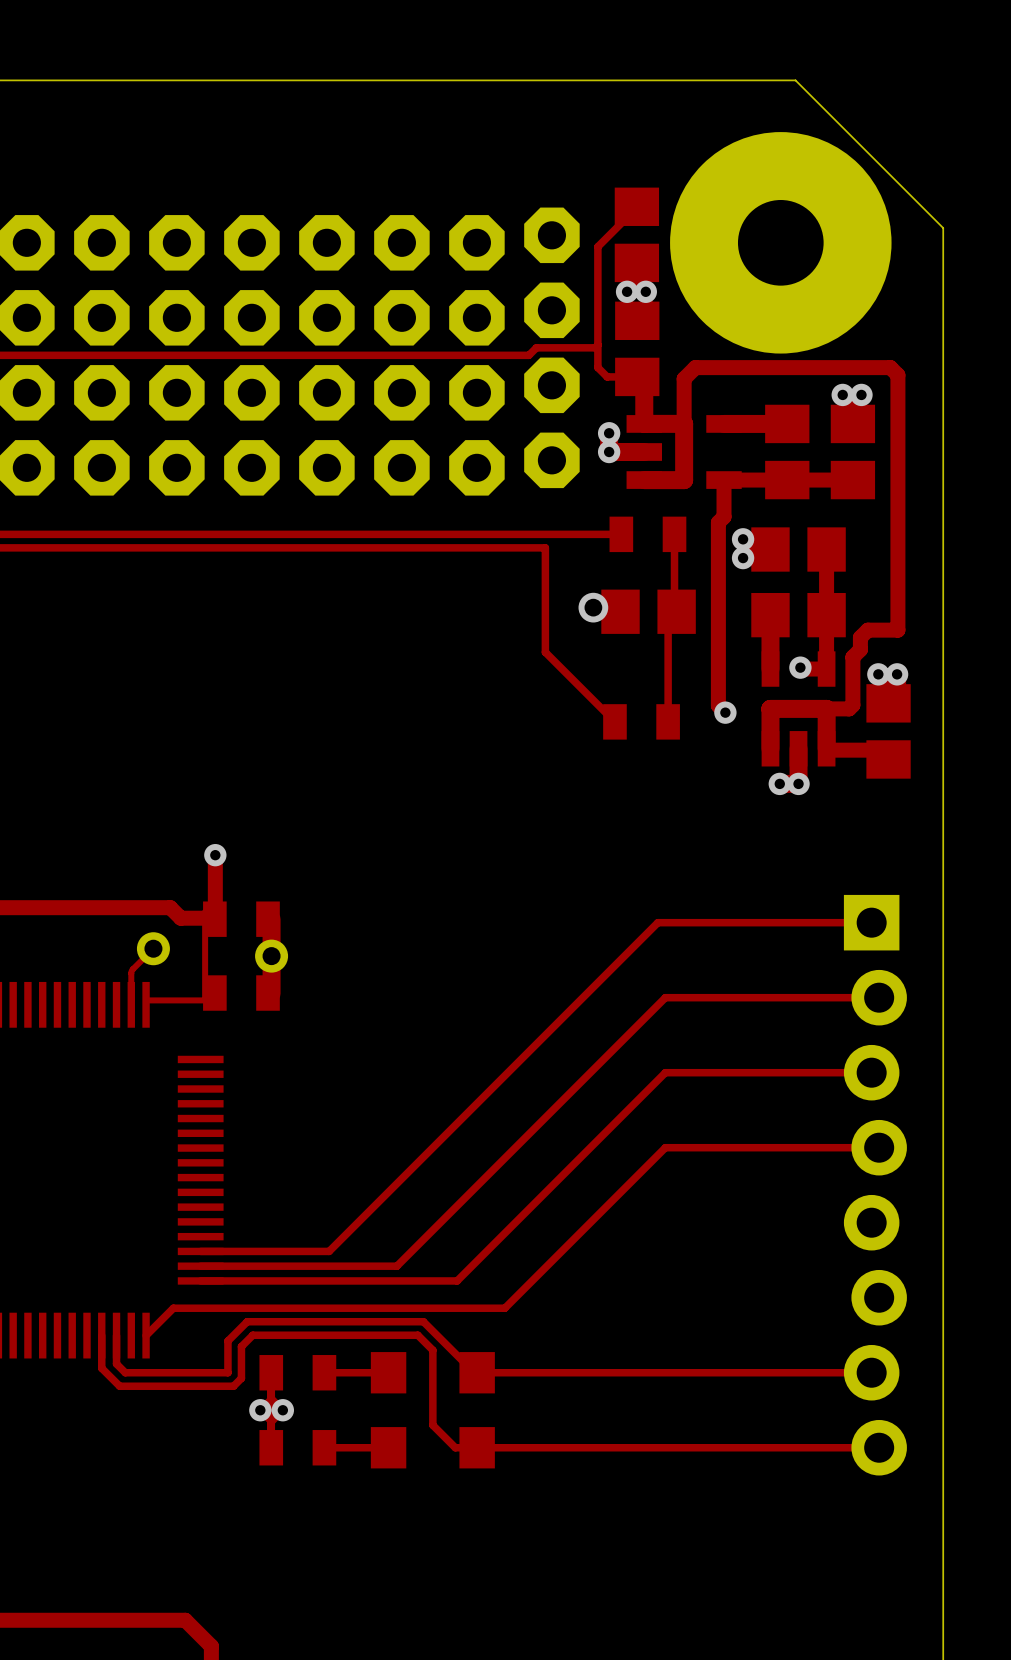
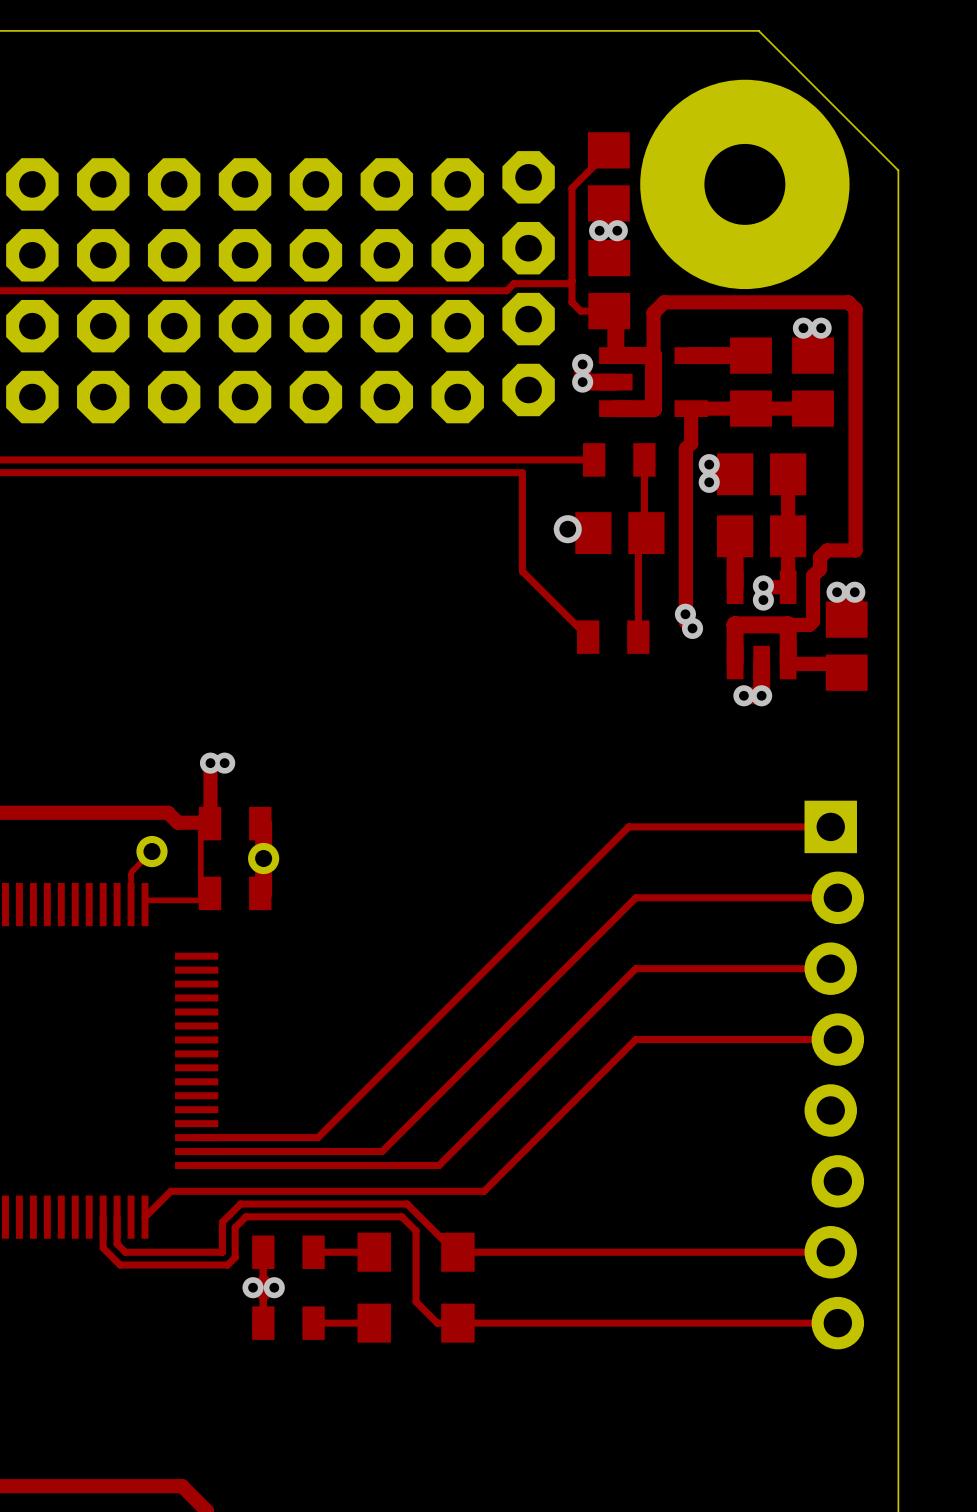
via: none -> (763, 600)
via: none -> (685, 614)
via: none -> (224, 763)

